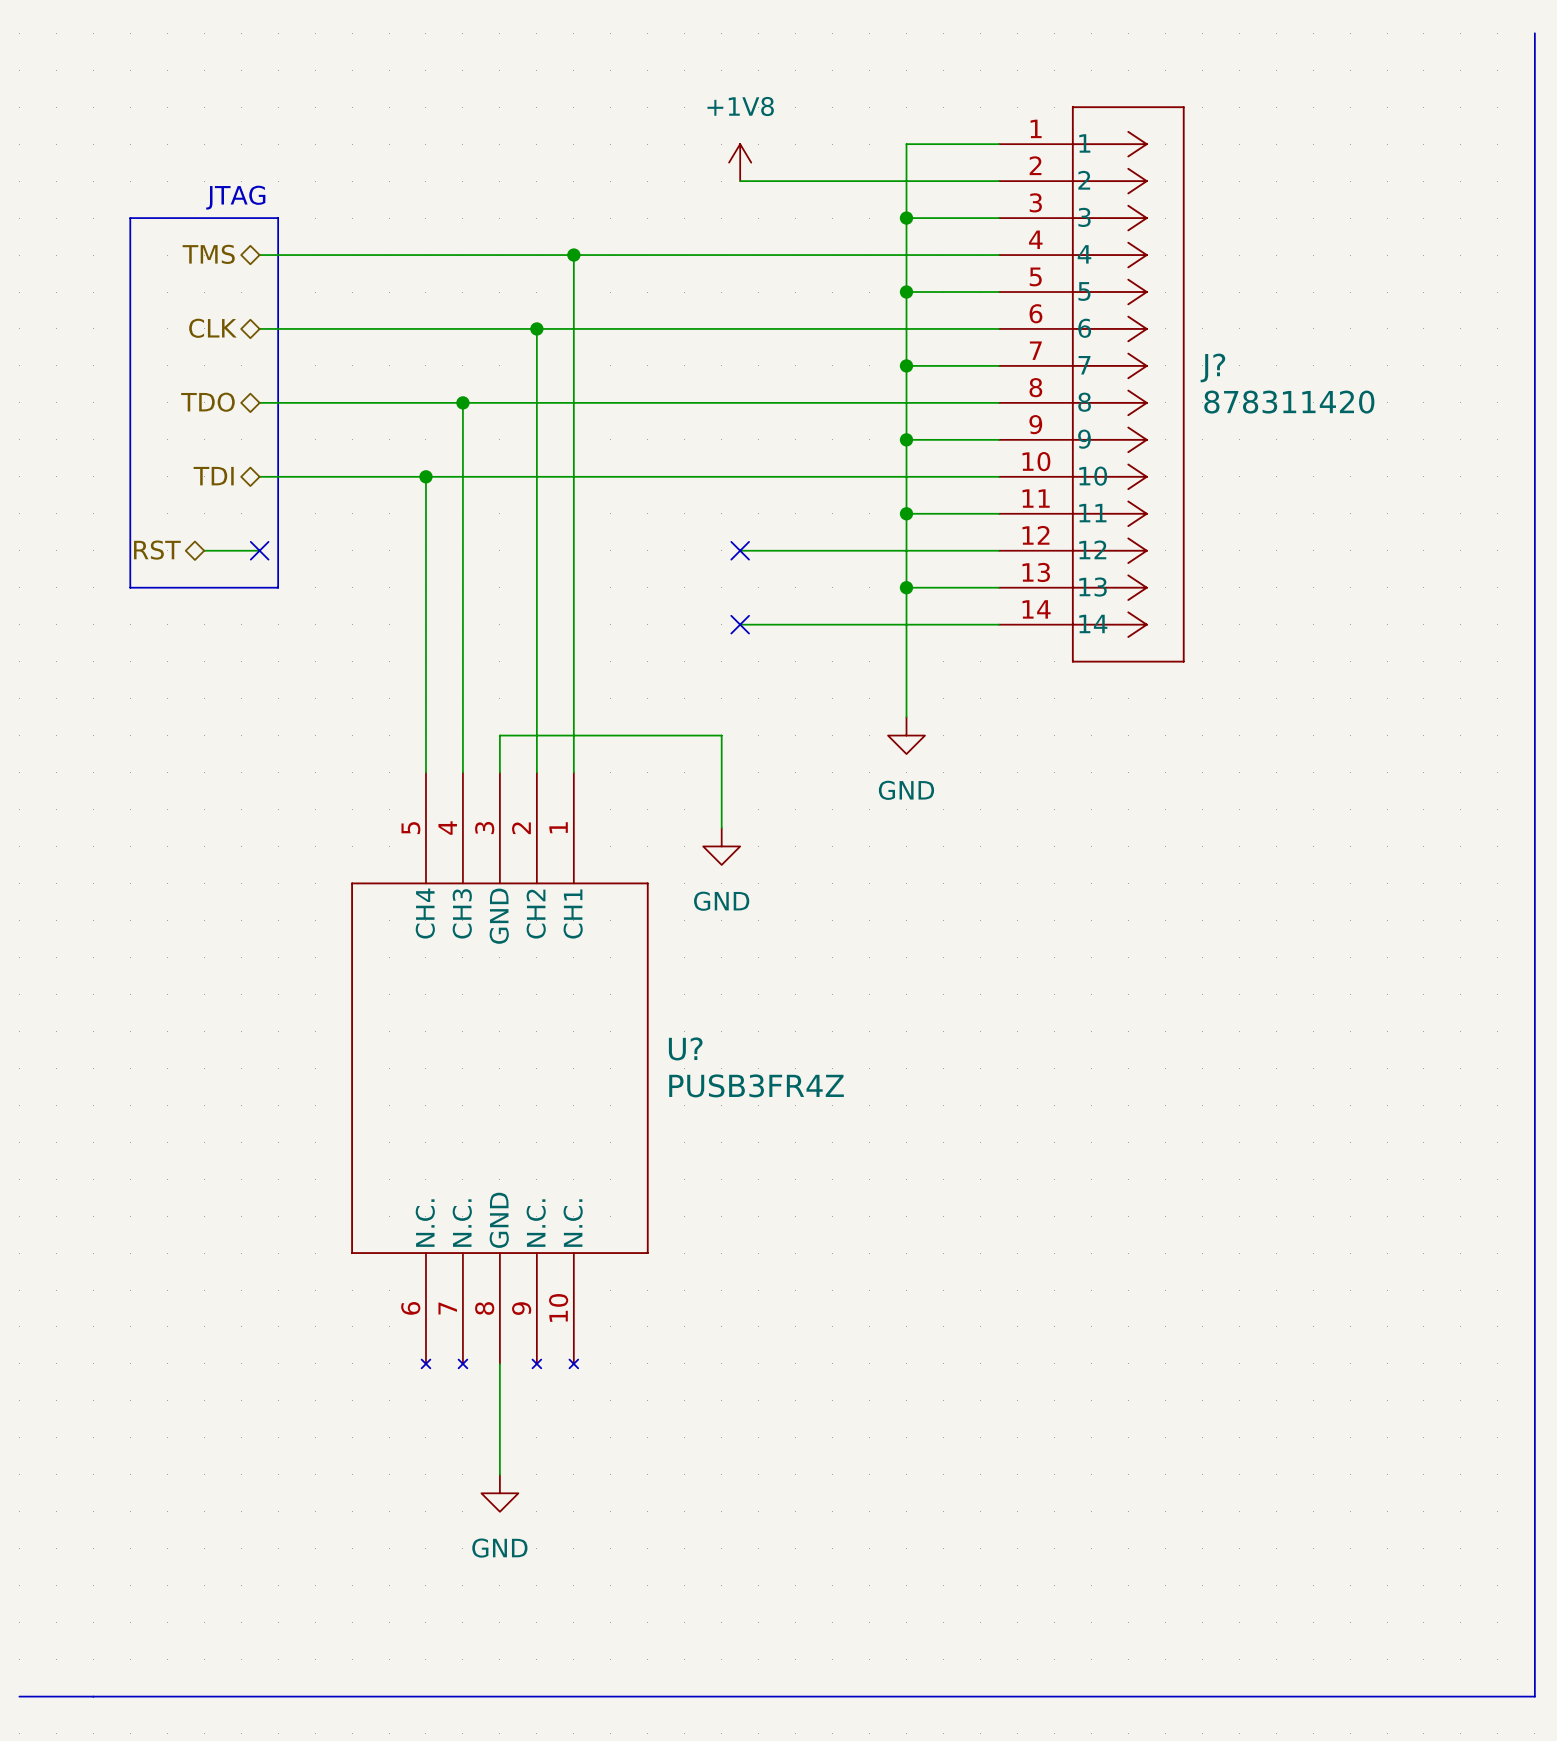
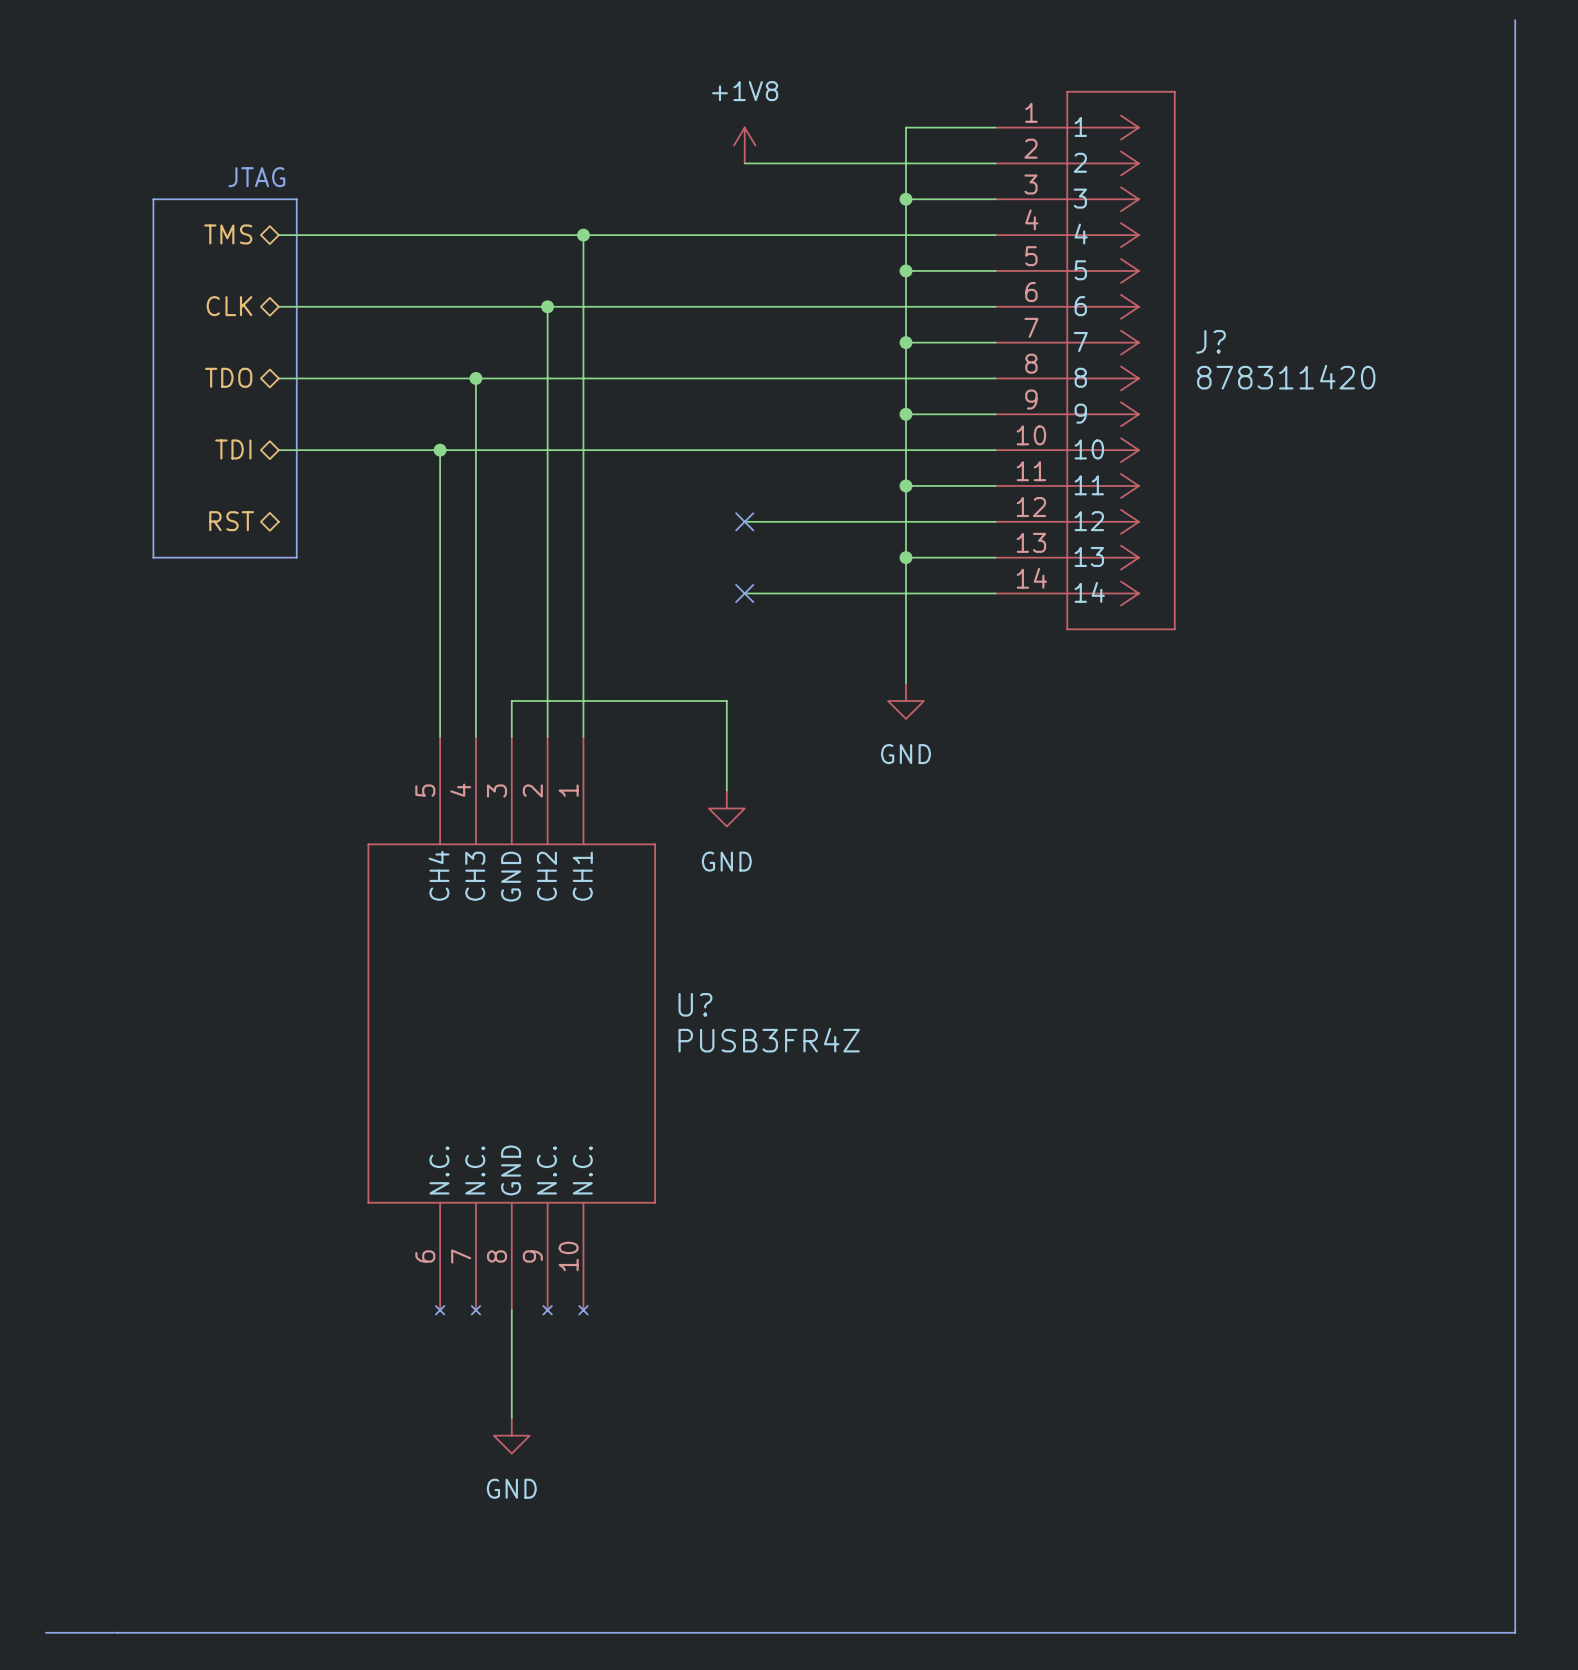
hierarchical label position: RST (157, 550) -> RST (231, 521)
wire: (204, 550) (259, 550) -> none
no-connect mark: (259, 550) -> none

